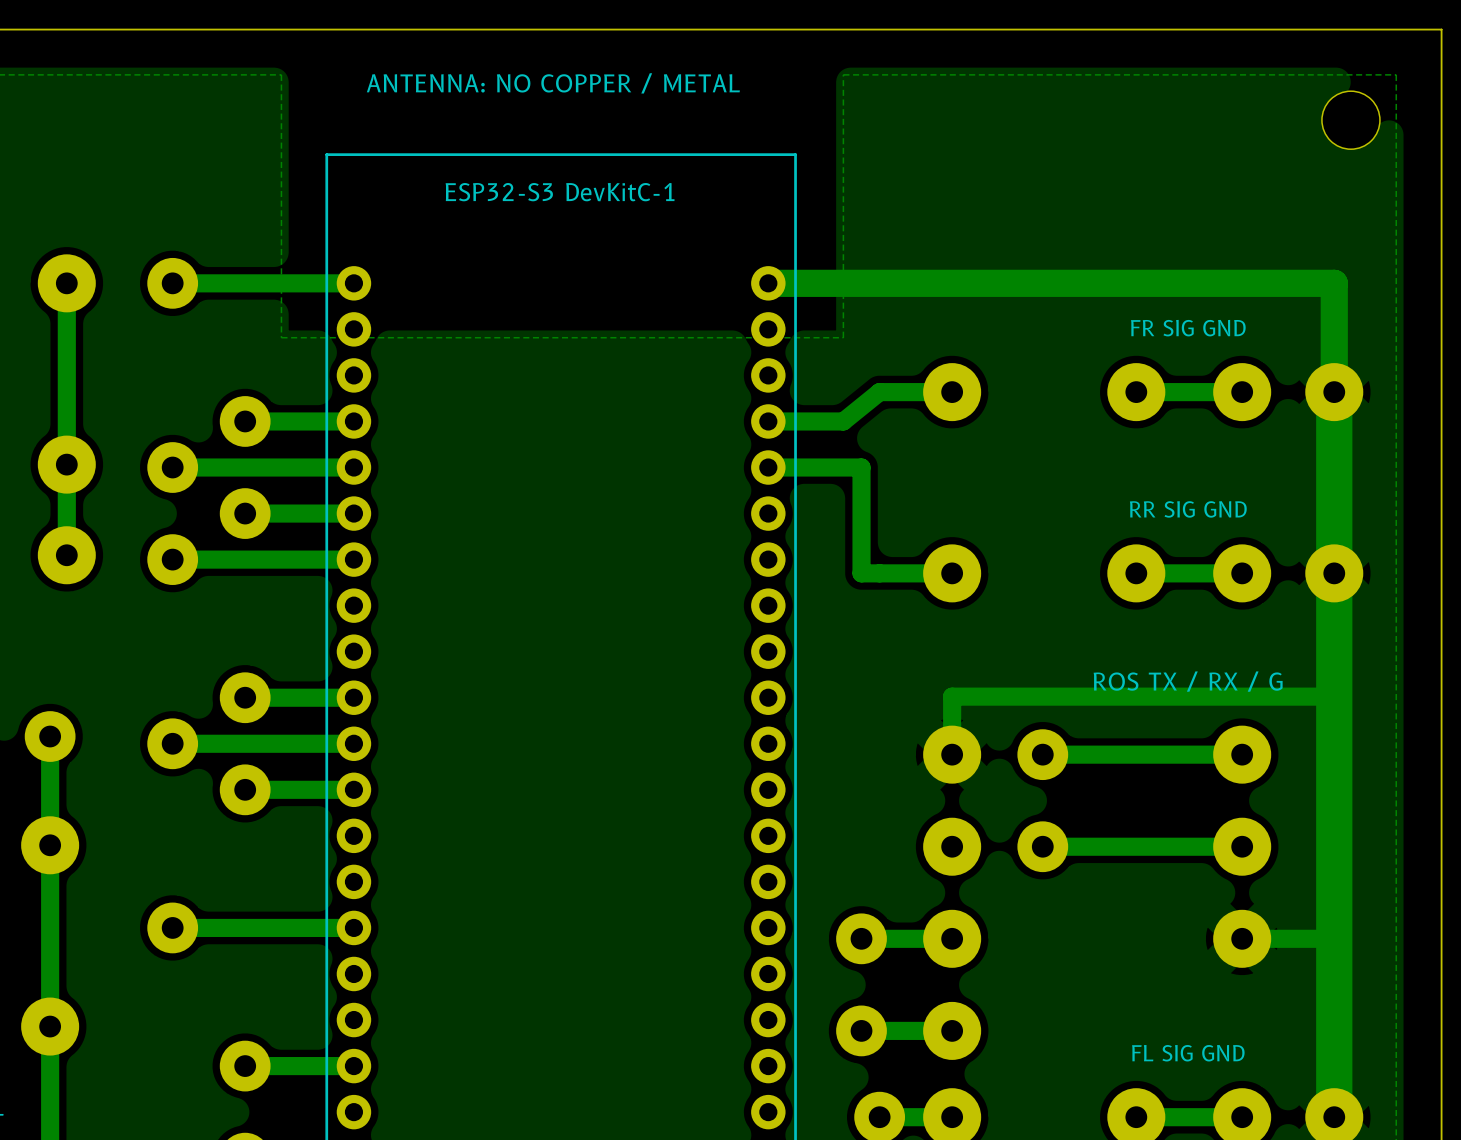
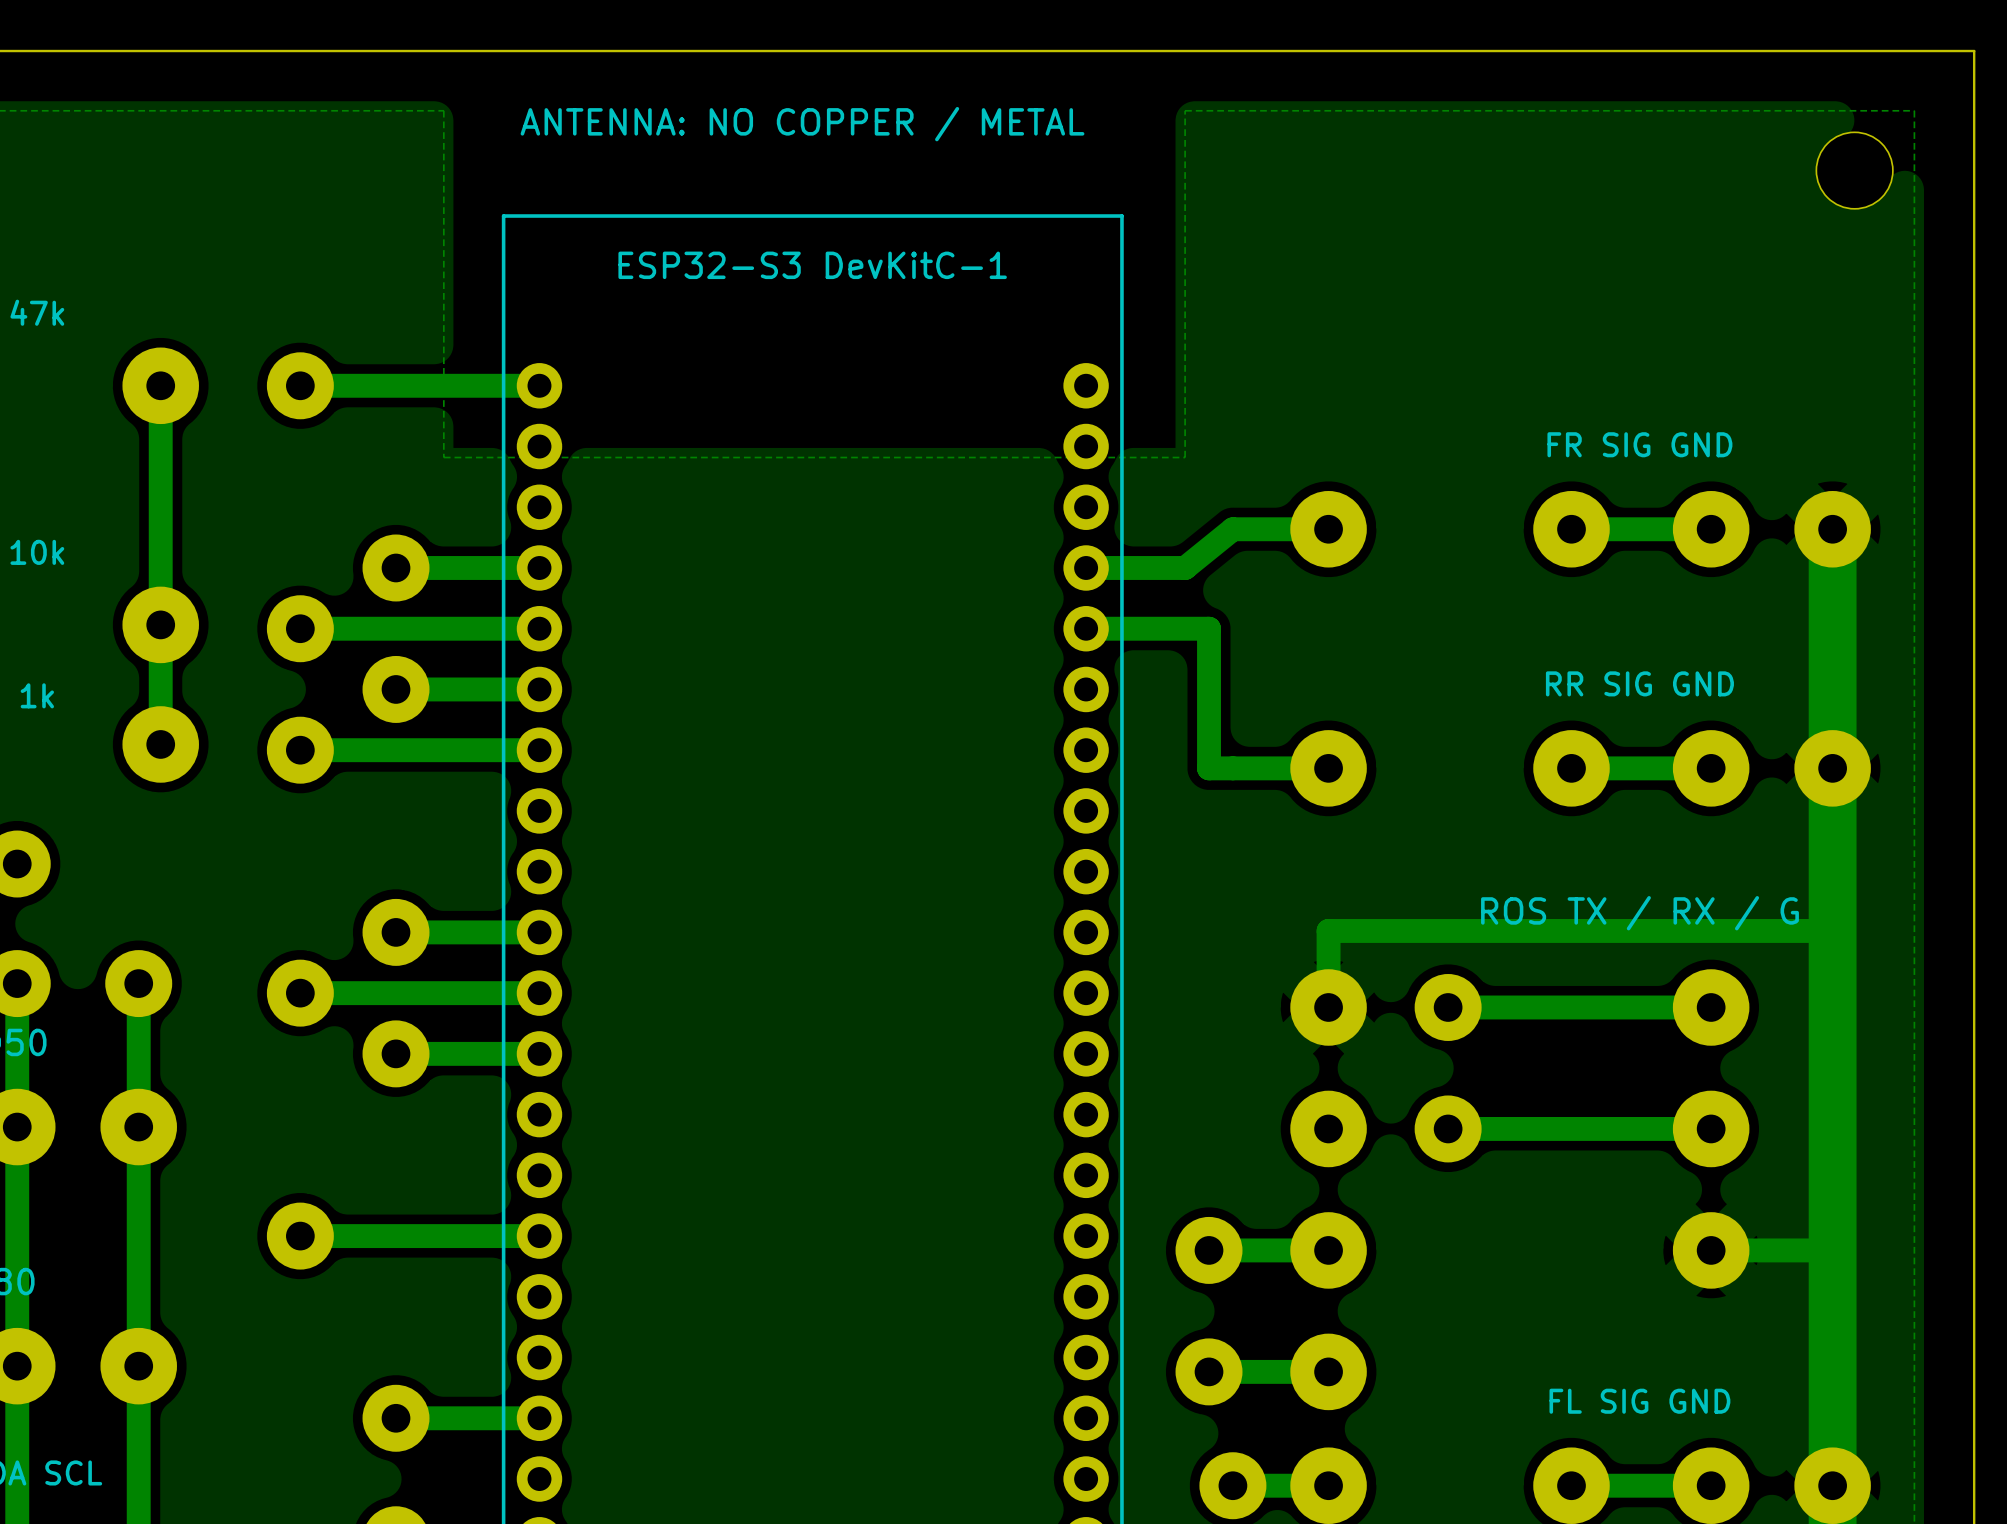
bottom track: (768, 283) (1334, 283) (1334, 392) -> none

